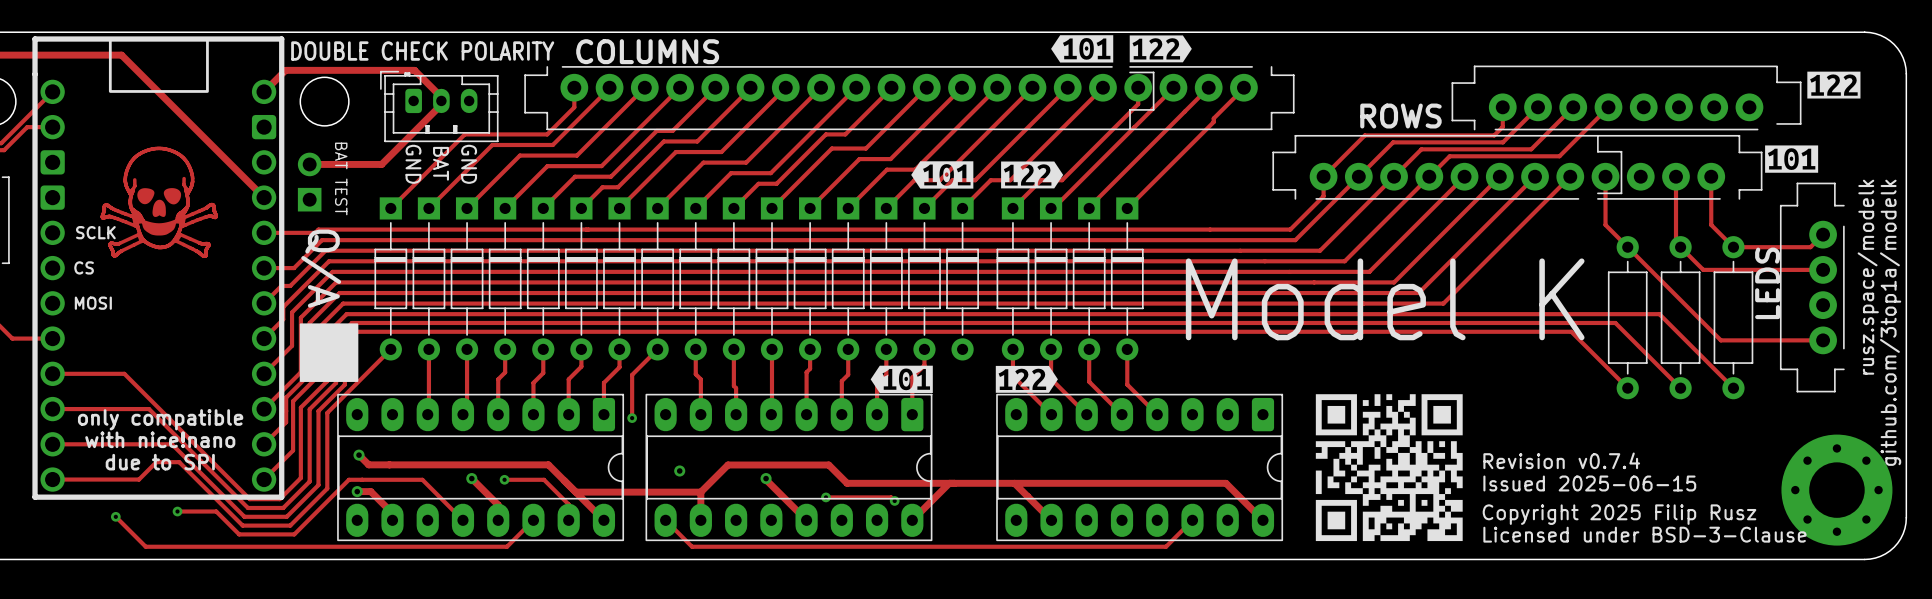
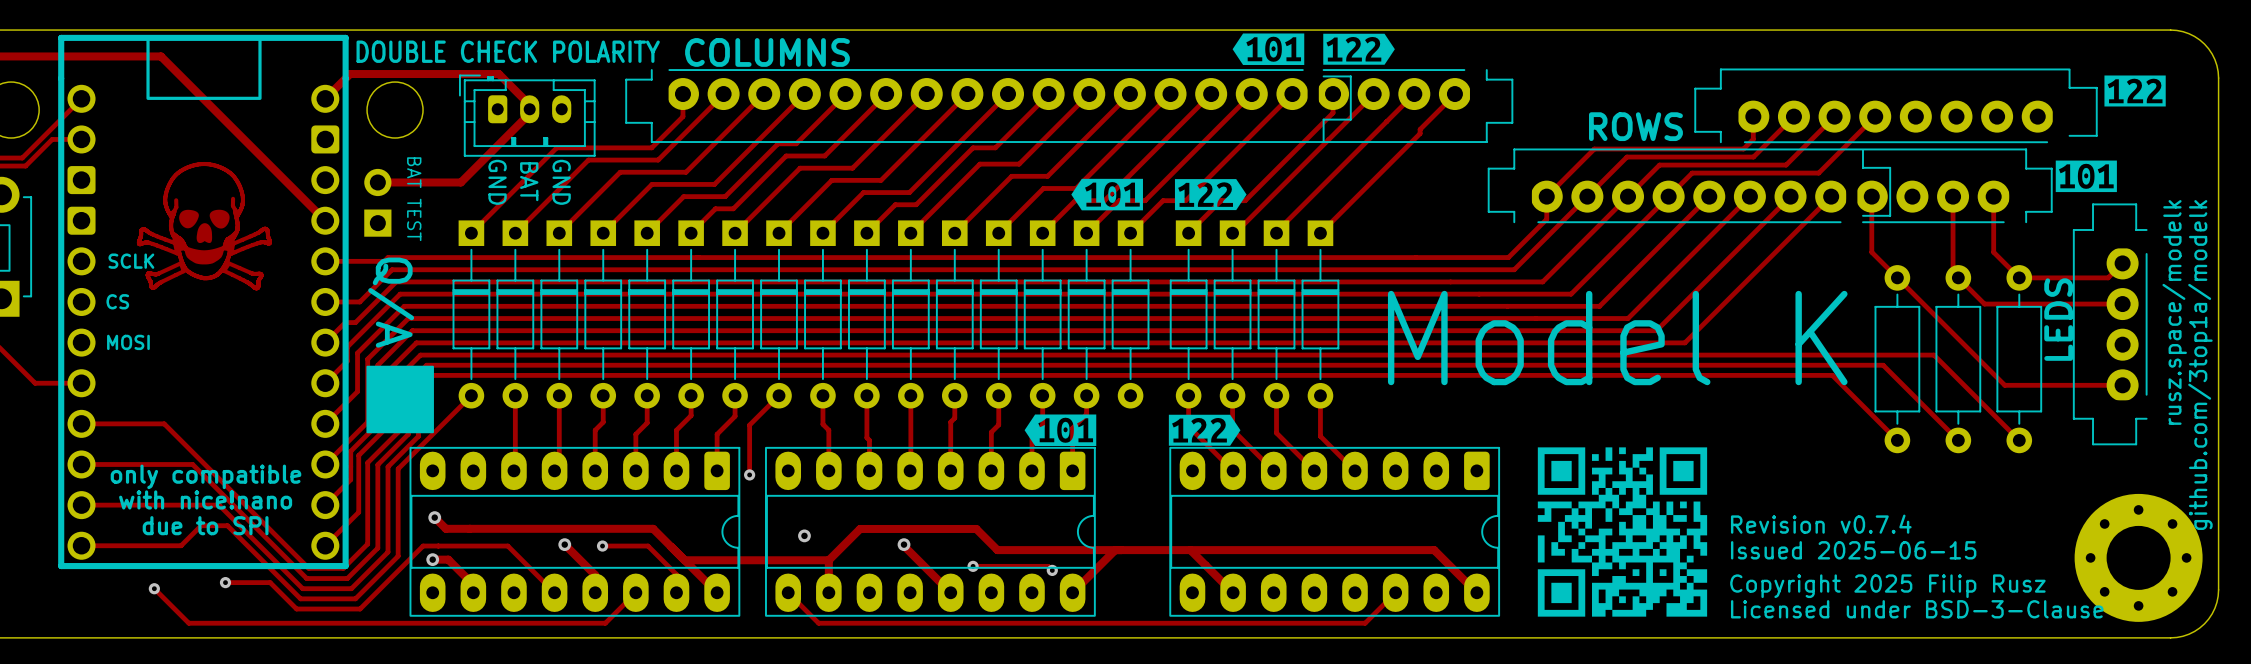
part footprint: [1451, 65, 1802, 131] -> [1694, 68, 2098, 144]
part footprint: [524, 66, 1295, 131] -> [625, 67, 1514, 143]
part footprint: [1272, 134, 1763, 200] -> [1487, 148, 2053, 224]
part footprint: [1779, 182, 1845, 393] -> [2072, 203, 2148, 446]

